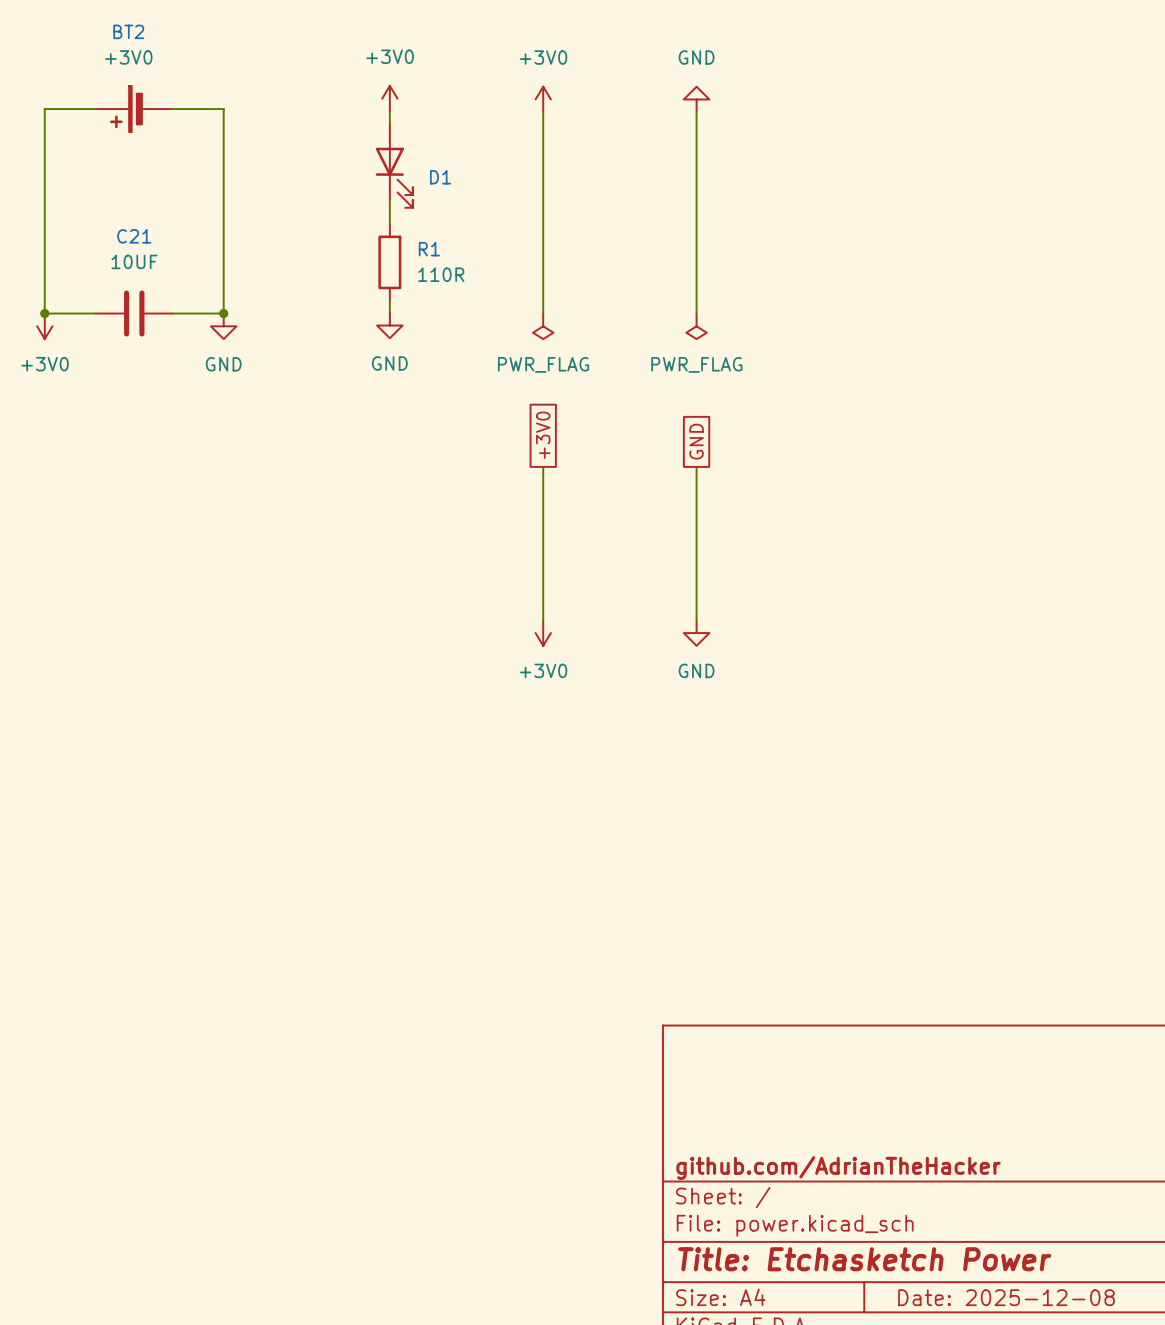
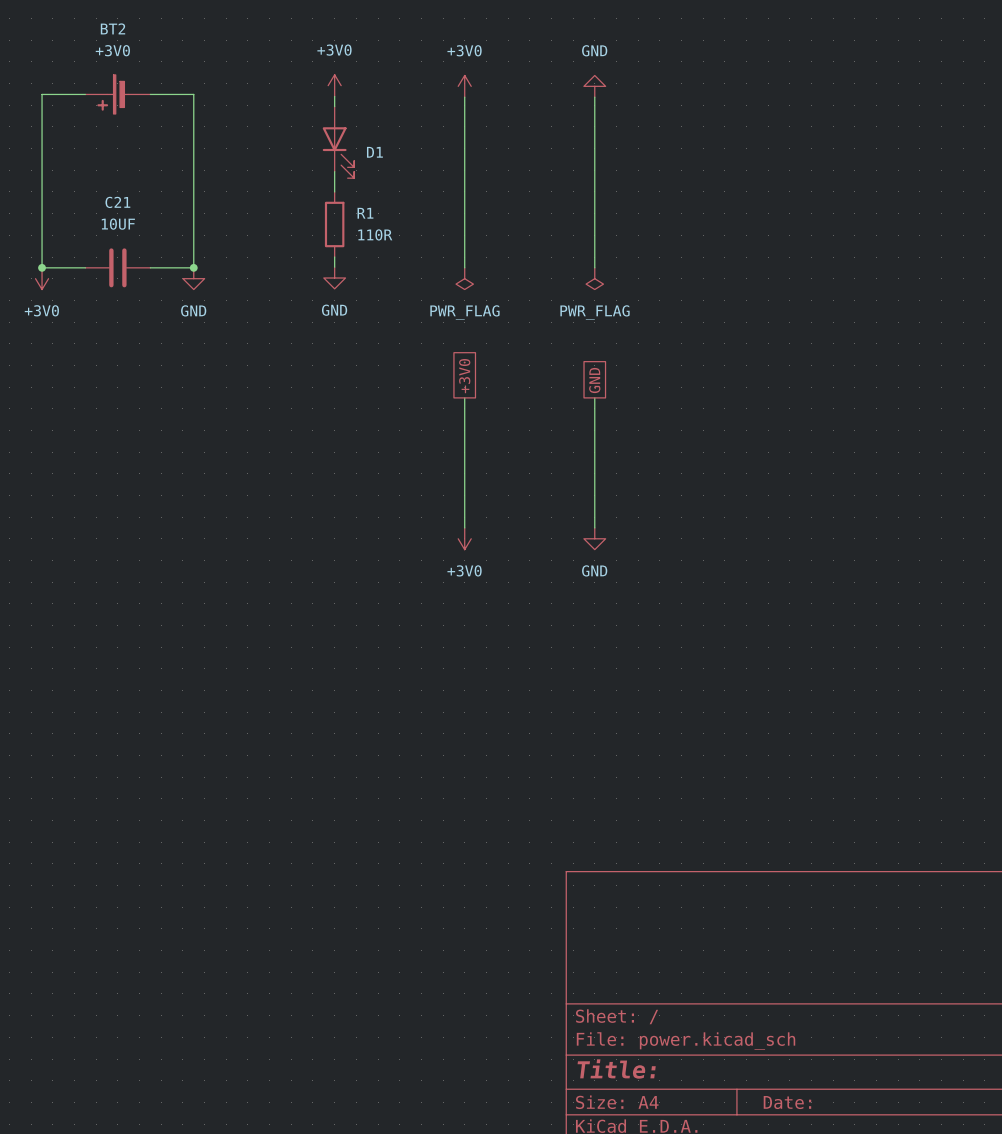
title block: github.com/AdrianTheHacker (838, 1168) -> none
title block: Title: Etchasketch Power (864, 1259) -> Title: (616, 1069)
title block: Date: 2025-12-08 (1006, 1297) -> Date: (787, 1102)

